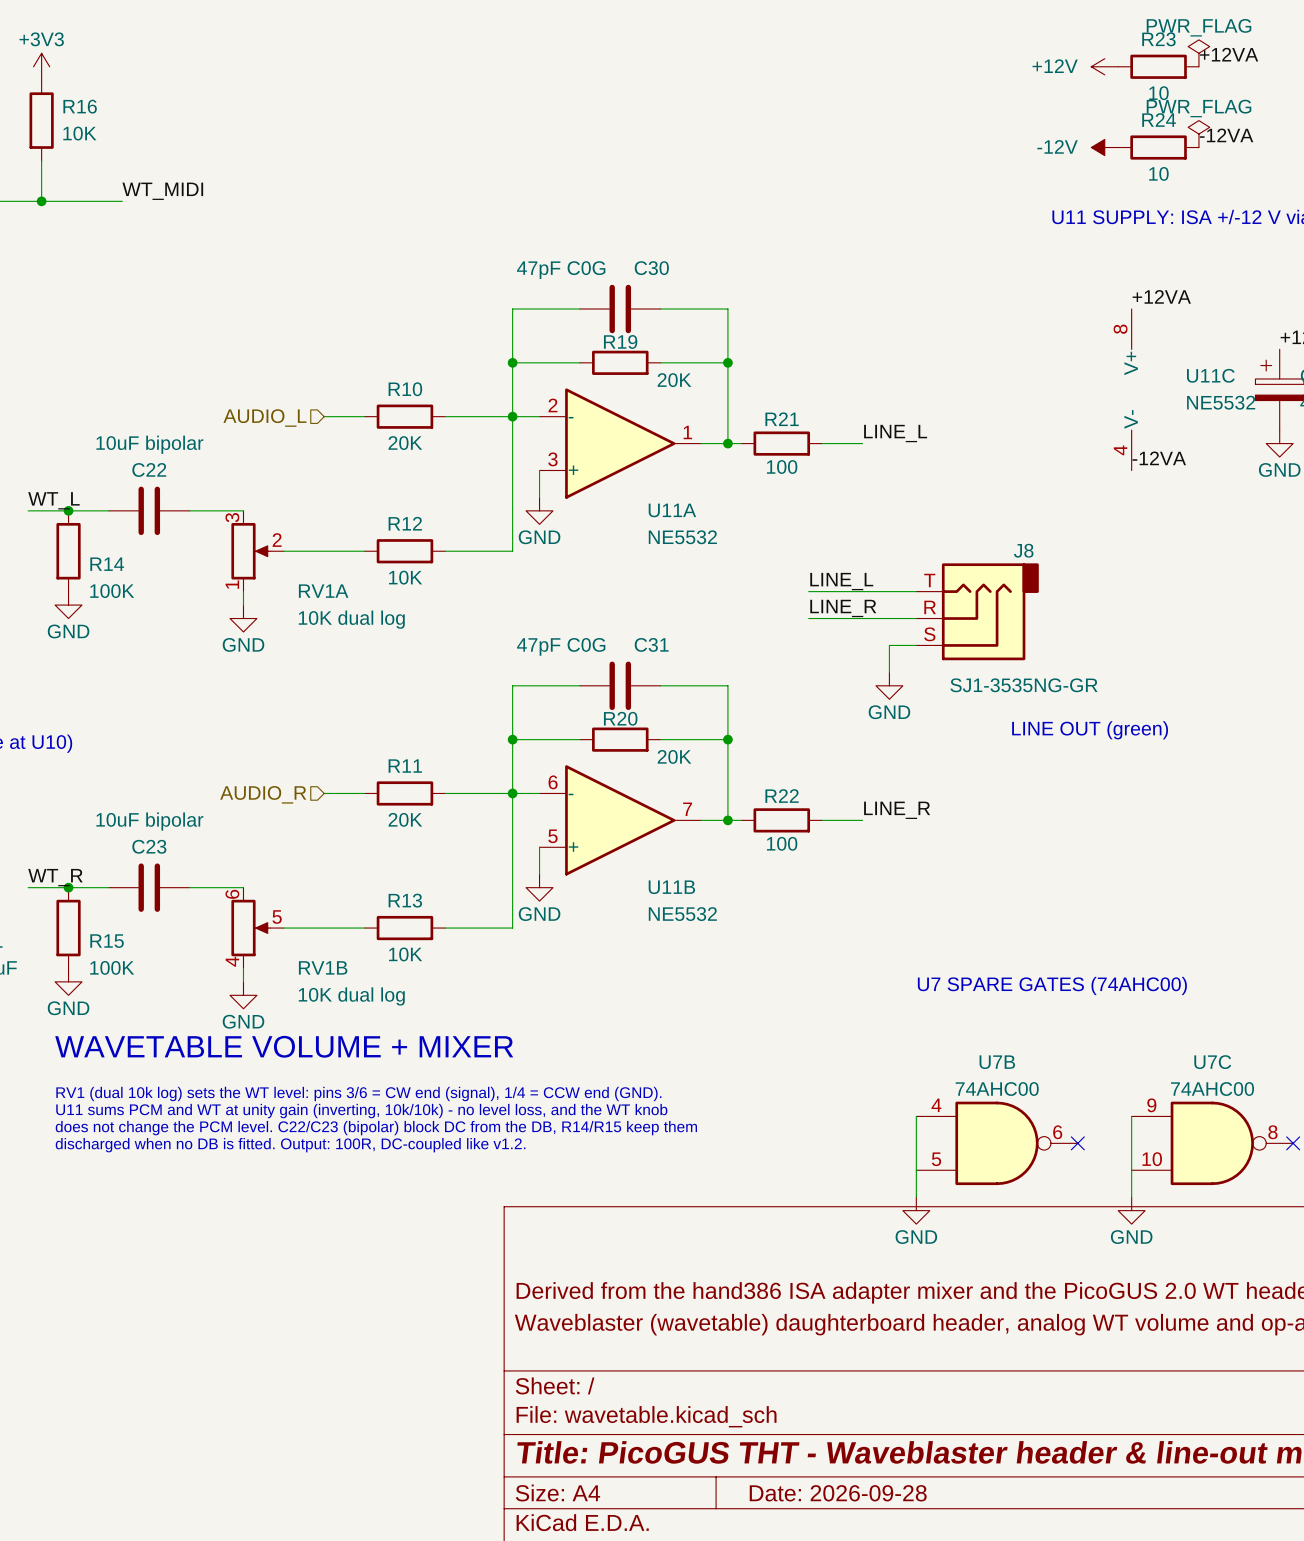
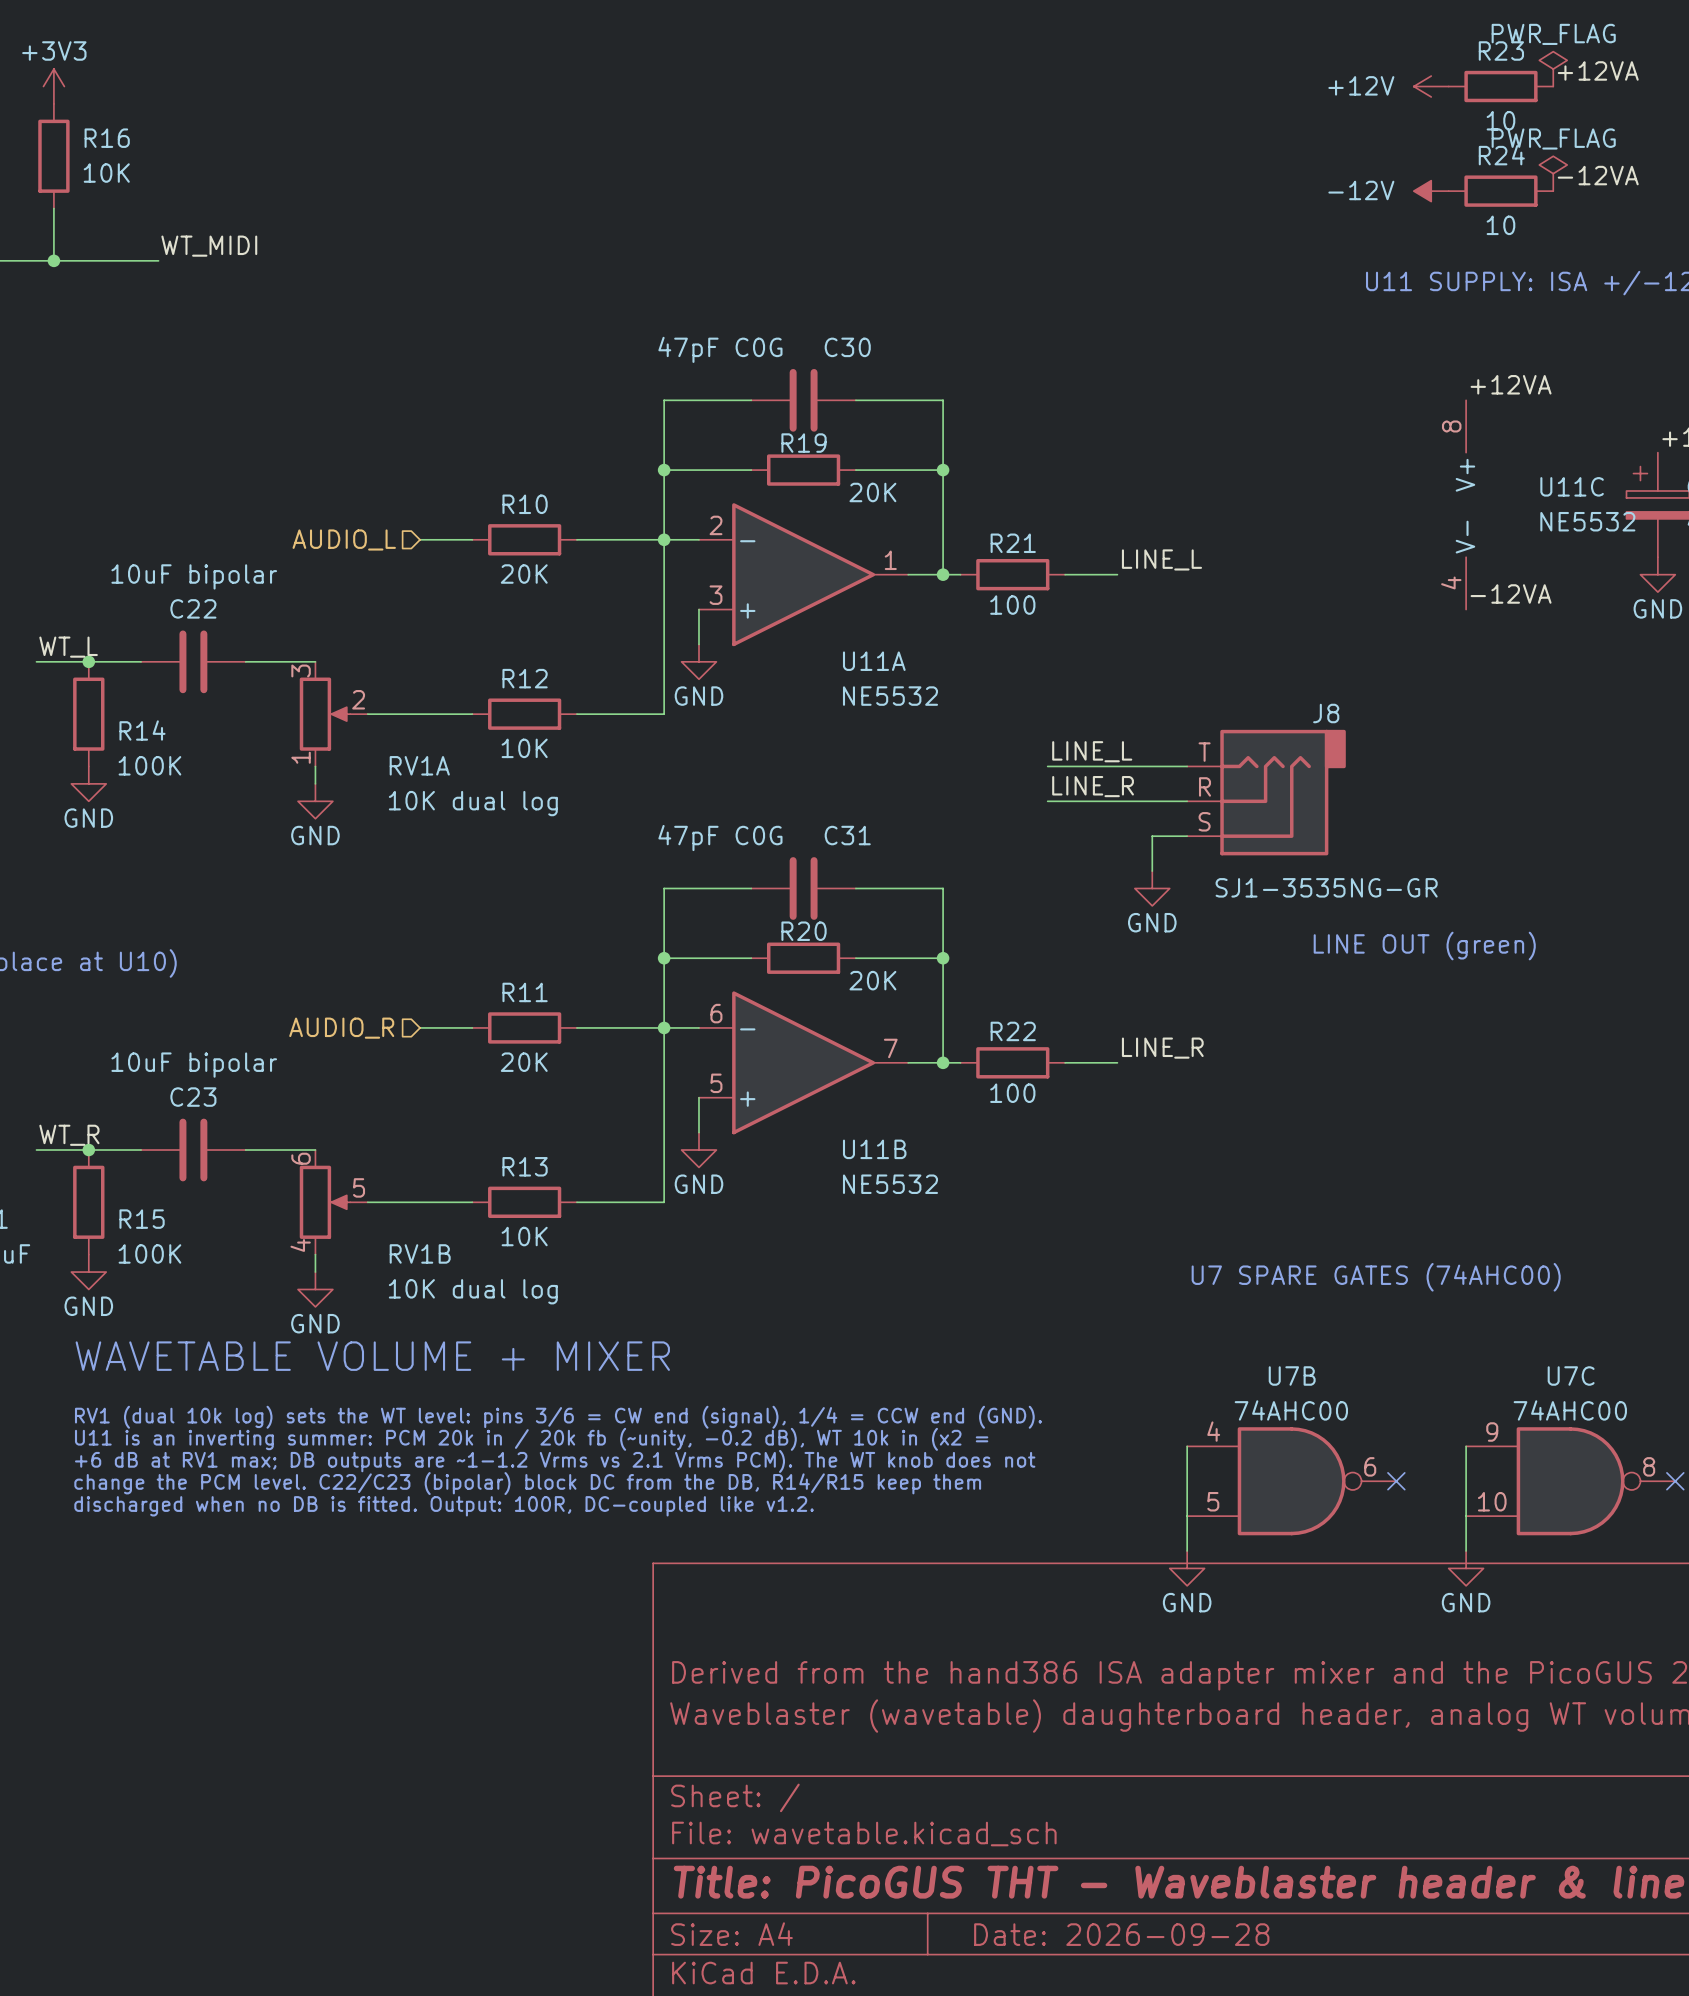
text: U11 sums PCM and WT at unity gain (inverting, 10k/10k) - no level loss, and the WT knob (361, 1111) -> U11 is an inverting summer: PCM 20k in / 20k fb (~unity, -0.2 dB), WT 10k in (x2 = (531, 1439)
text: does not change the PCM level. C22/C23 (bipolar) block DC from the DB, R14/R15 keep them (376, 1128) -> +6 dB at RV1 max; DB outputs are ~1-1.2 Vrms vs 2.1 Vrms PCM). The WT knob does not (555, 1461)
text: discharged when no DB is fitted. Output: 100R, DC-coupled like v1.2. (290, 1145) -> change the PCM level. C22/C23 (bipolar) block DC from the DB, R14/R15 keep them (527, 1483)
text: none -> discharged when no DB is fitted. Output: 100R, DC-coupled like v1.2. (444, 1506)

